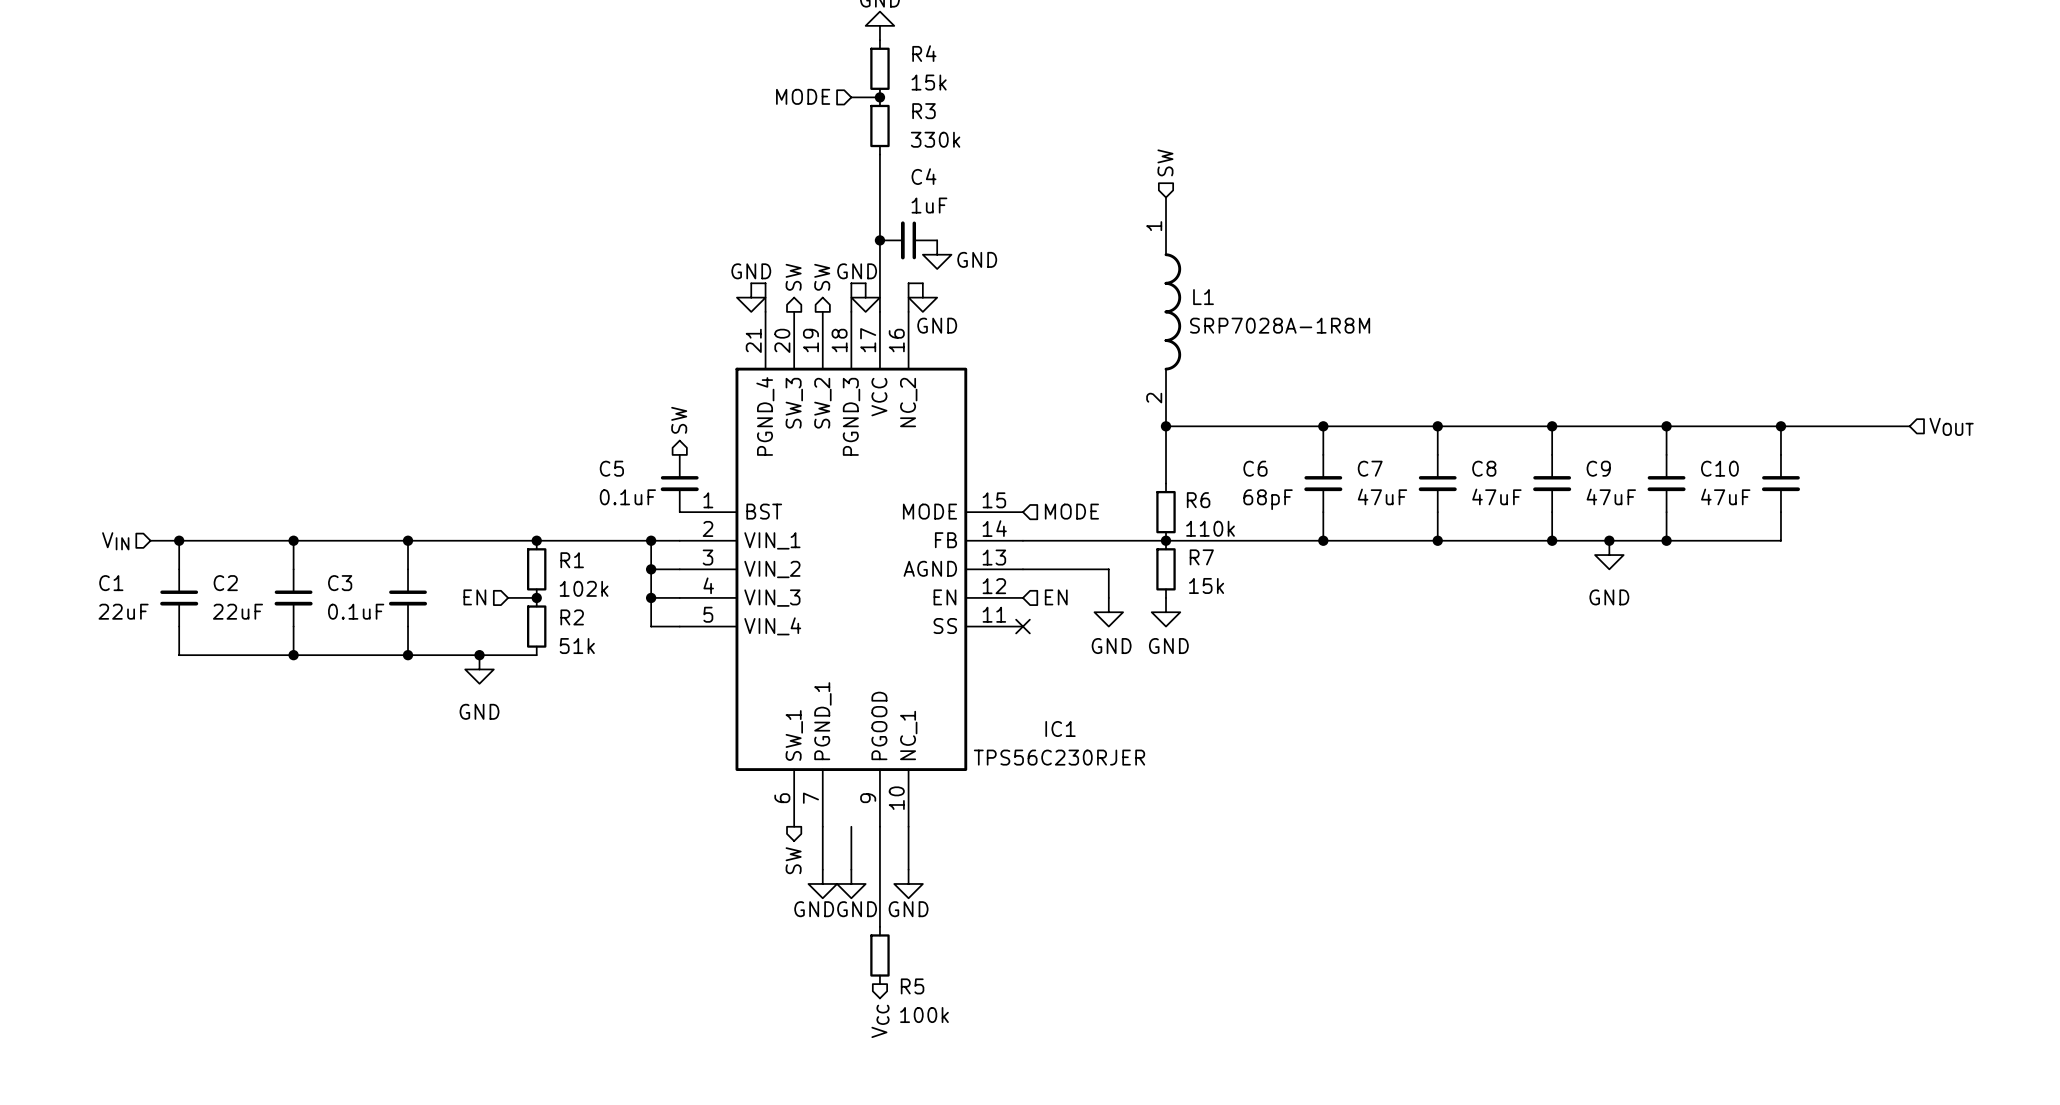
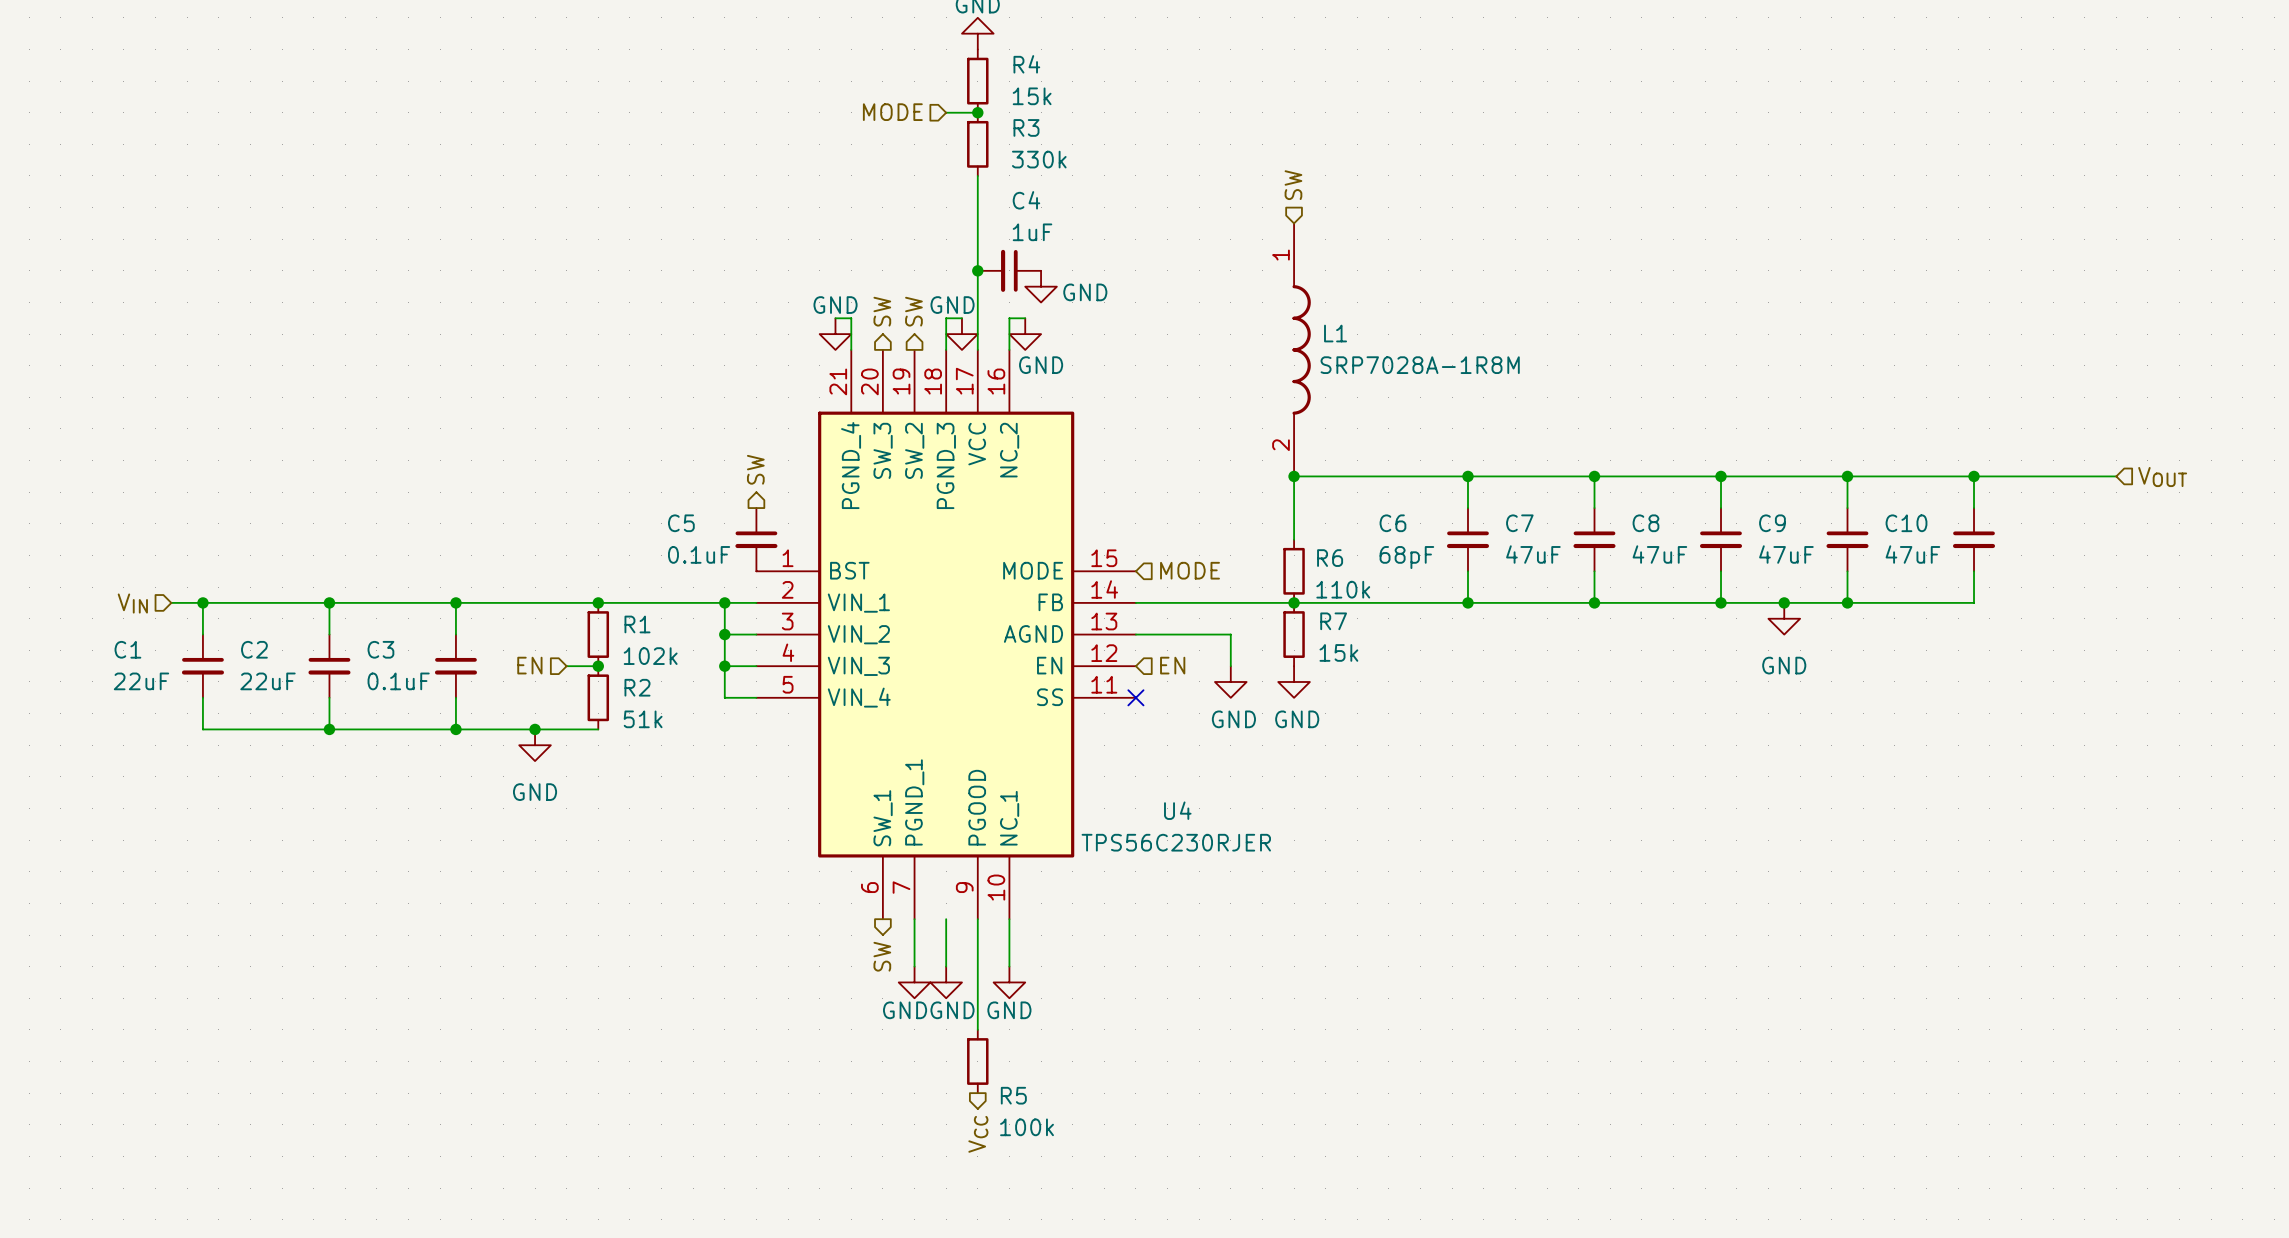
IC1 name: IC1 (1060, 728) -> U4 (1177, 810)

